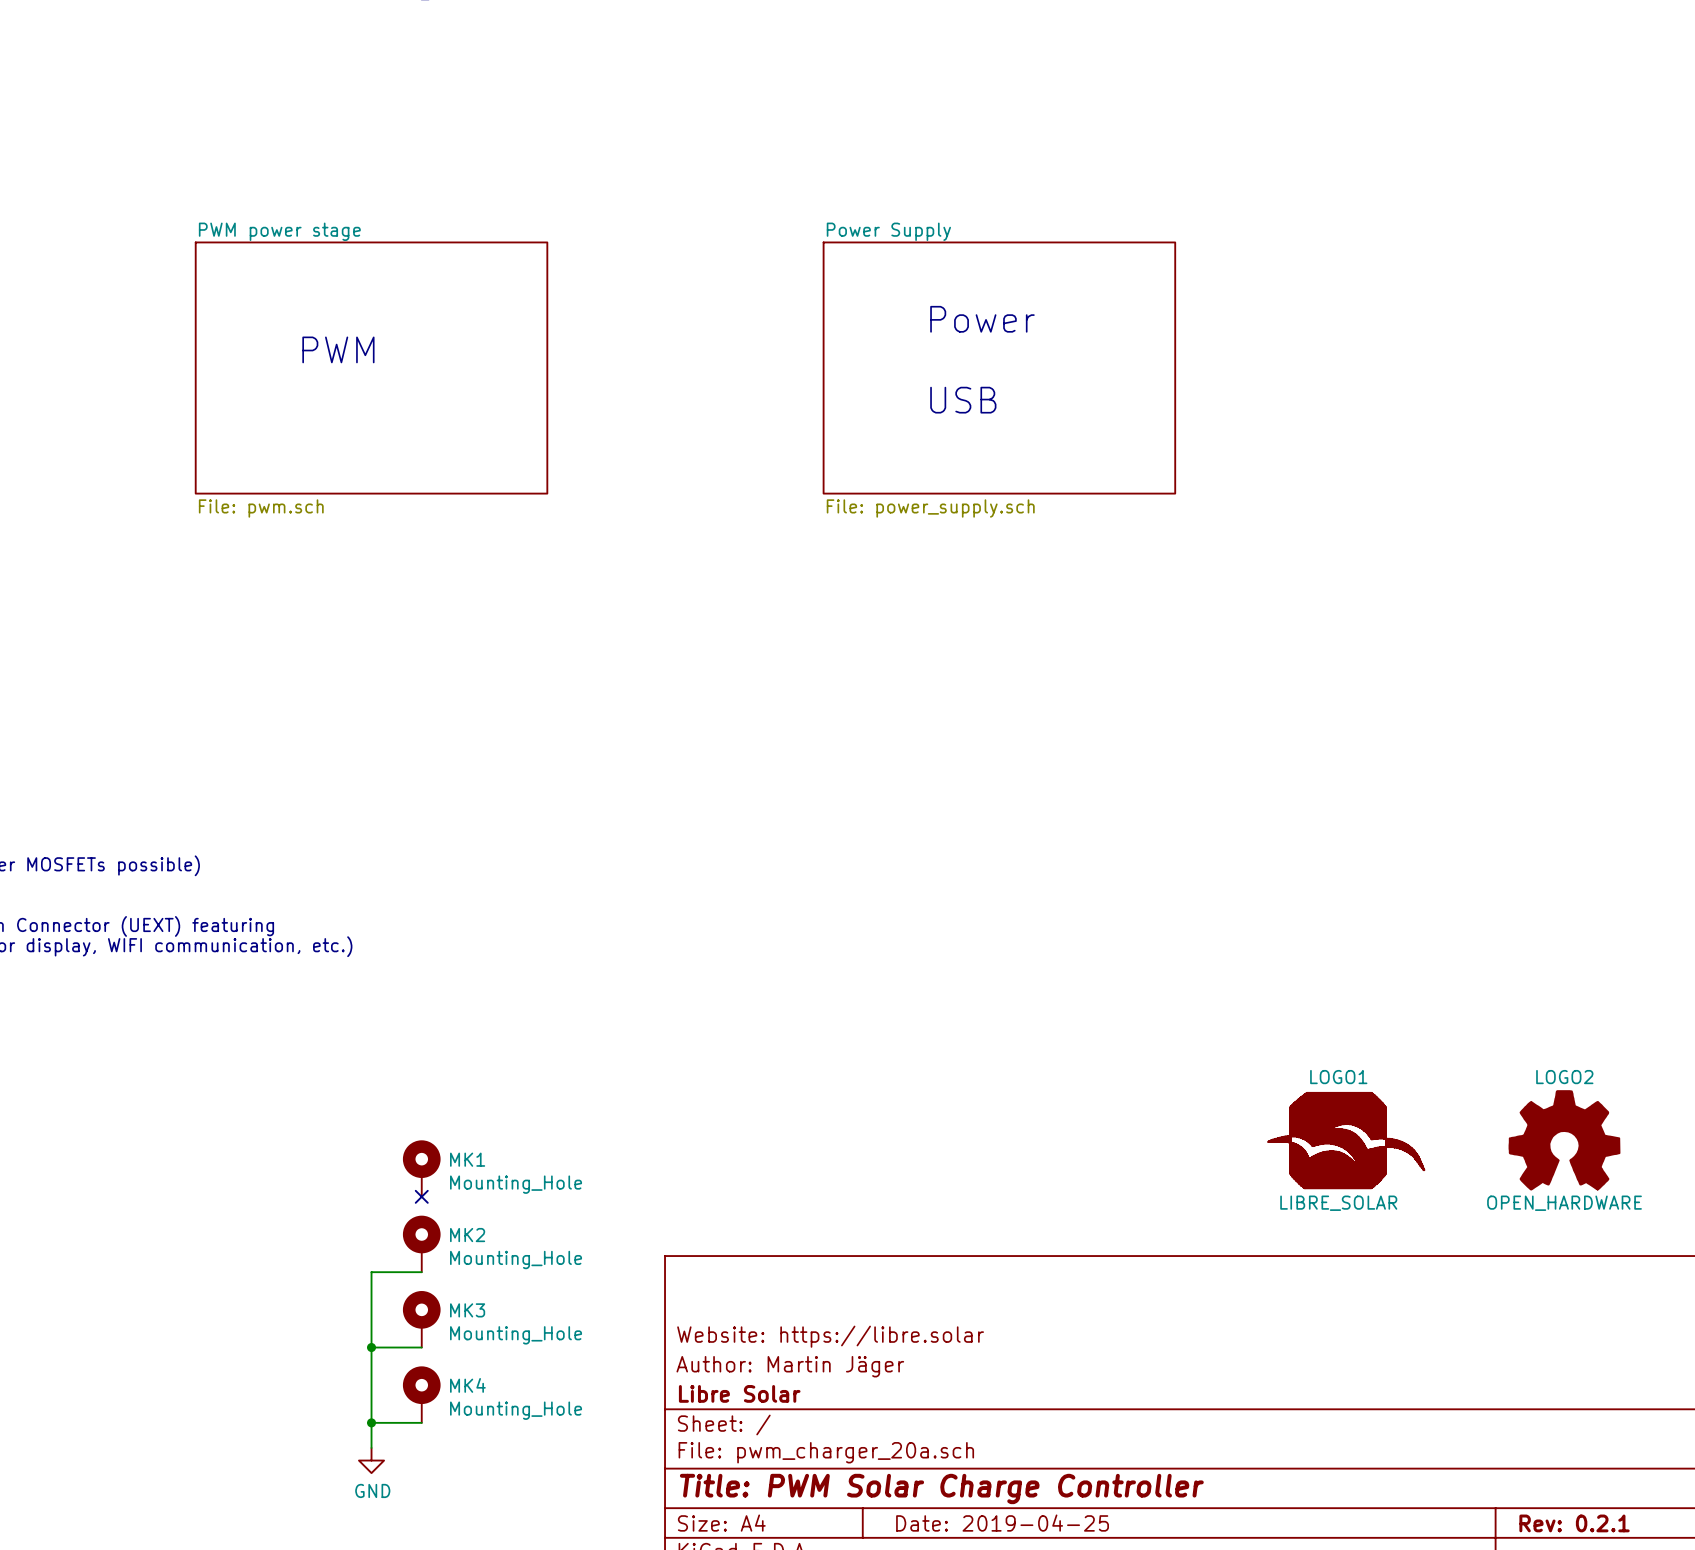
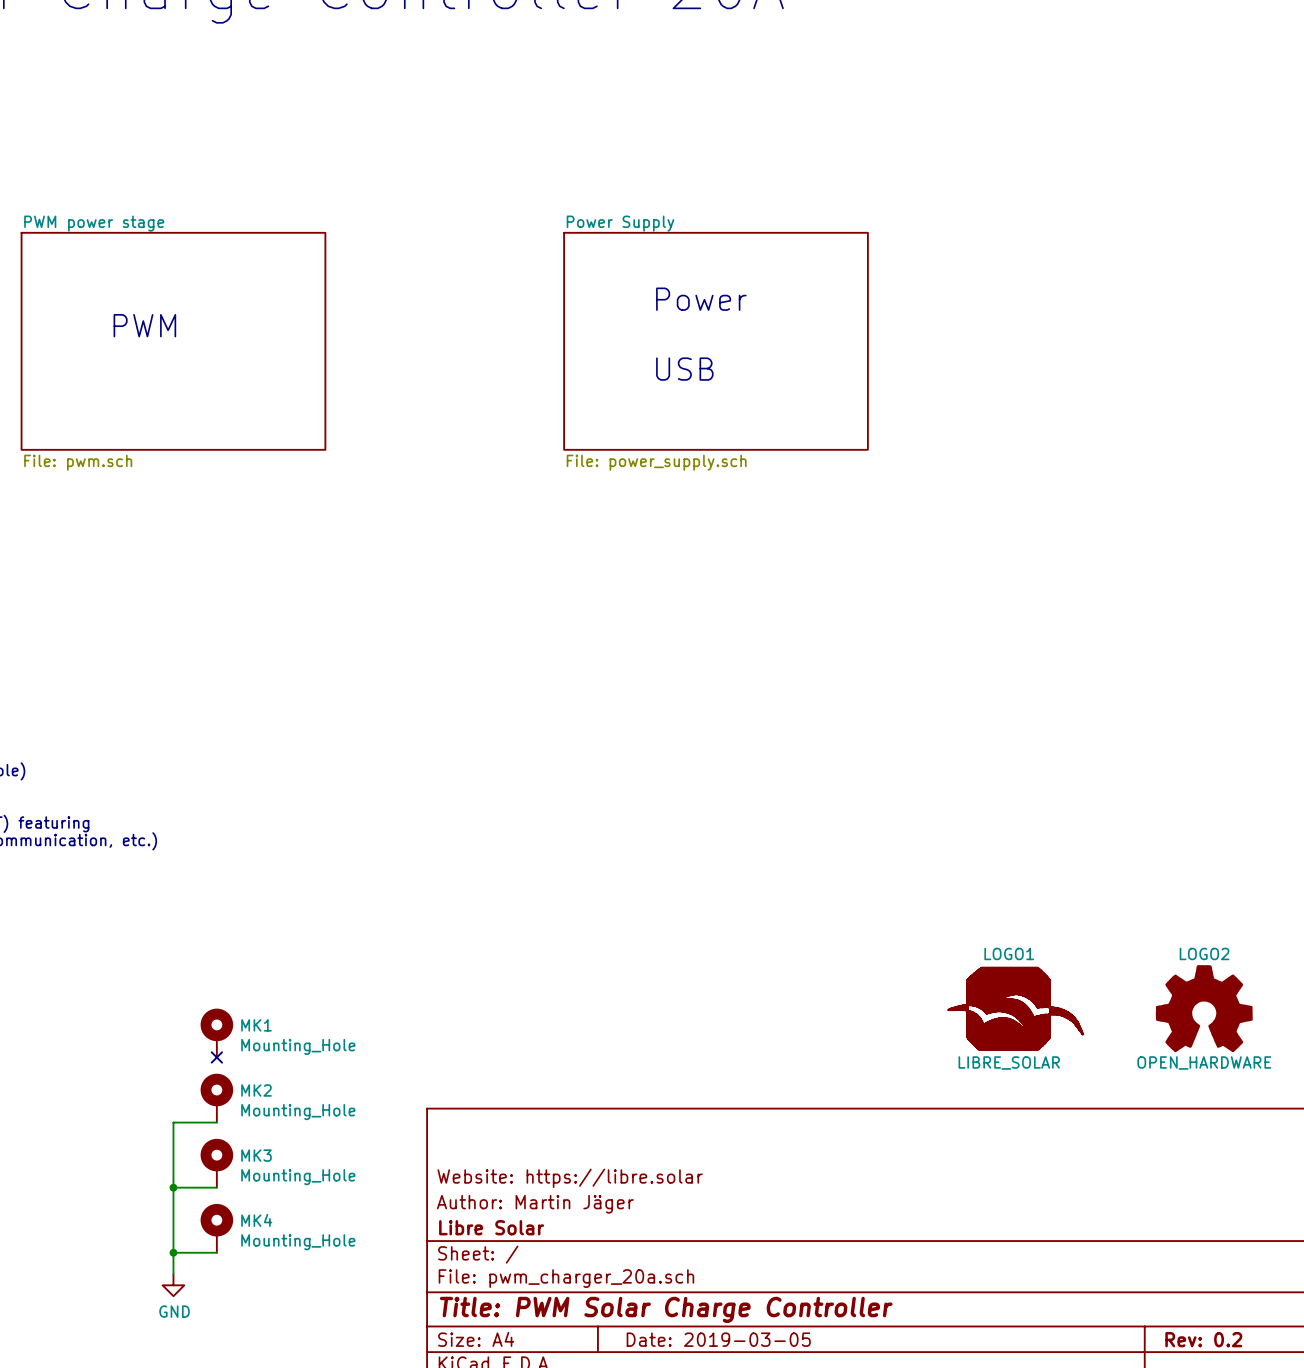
title block: Date: 2019-04-25 (1002, 1523) -> Date: 2019-03-05 (718, 1339)
title block: Rev: 0.2.1 (1574, 1523) -> Rev: 0.2 (1203, 1339)

